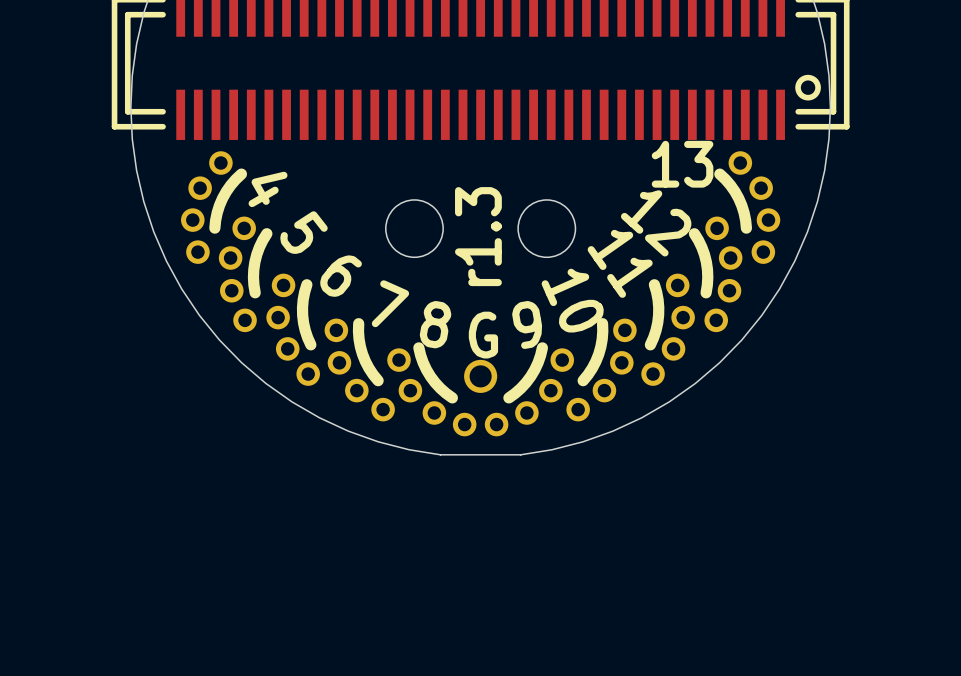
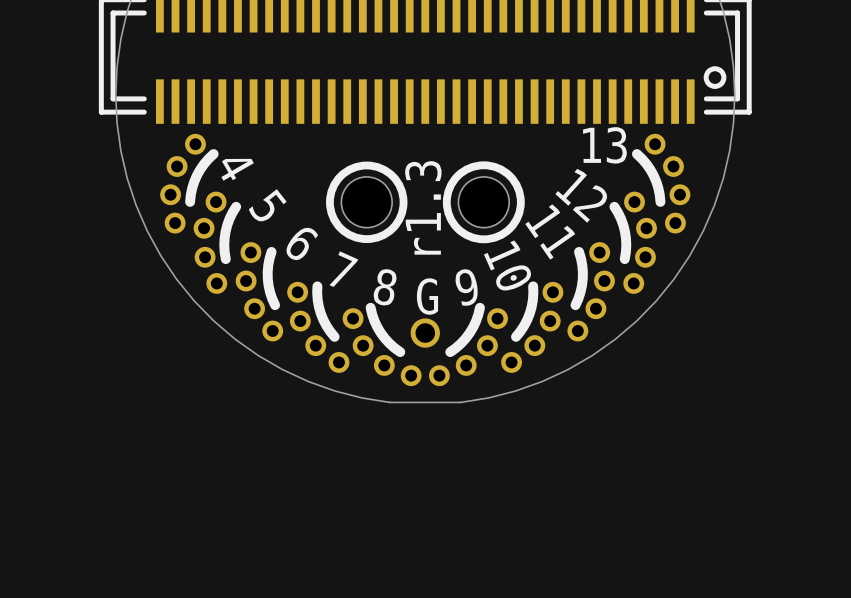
drawing: none -> [326, 161, 525, 244]

